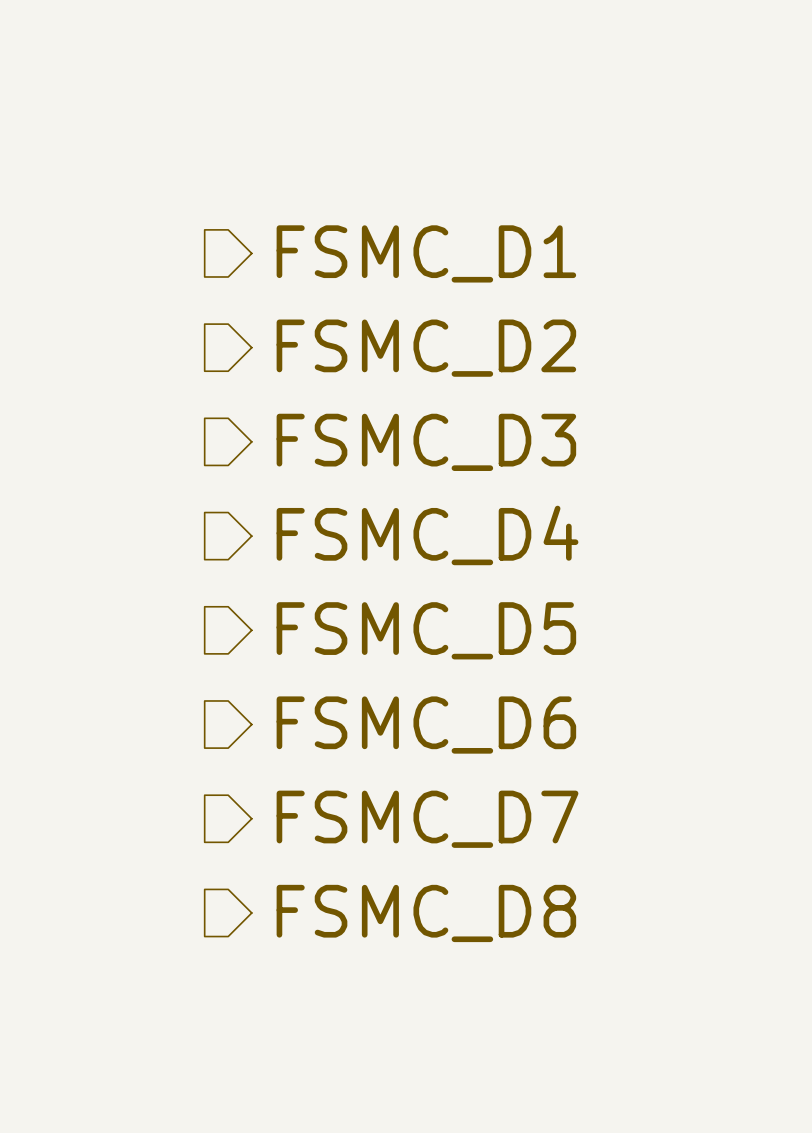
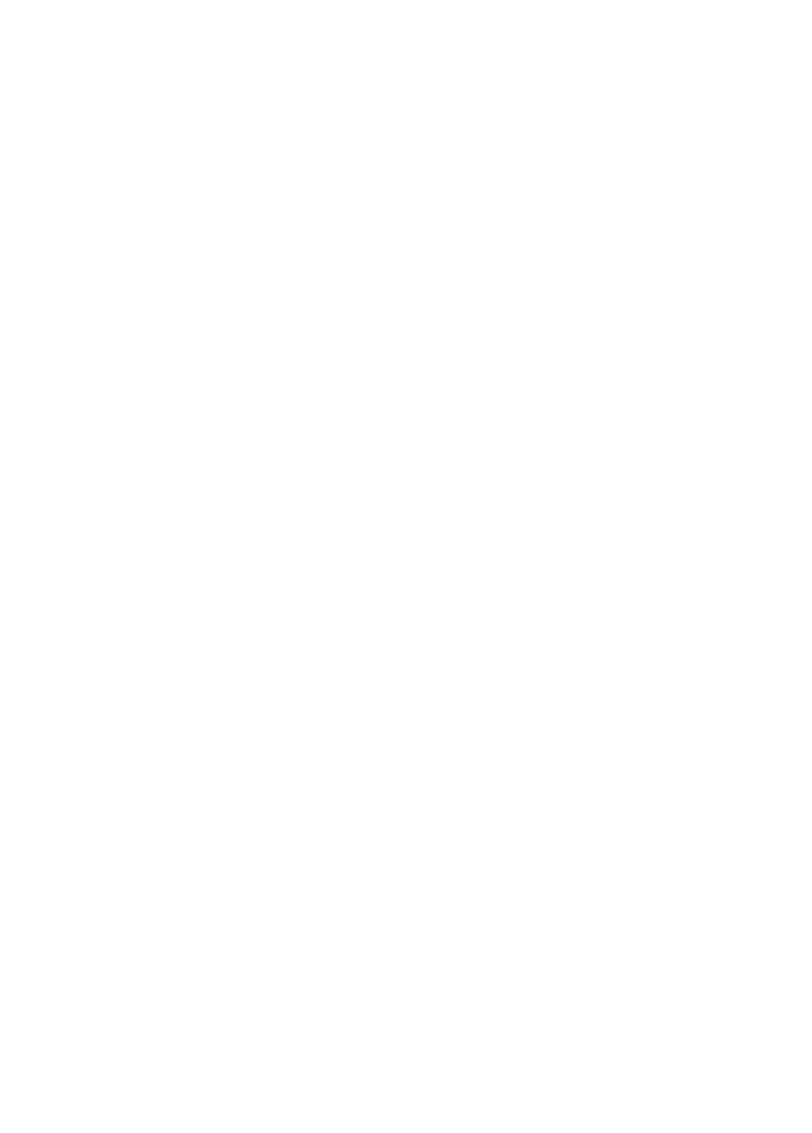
hierarchical label: FSMC_D1 (426, 253) -> none
hierarchical label: FSMC_D2 (426, 348) -> none
hierarchical label: FSMC_D3 (426, 442) -> none
hierarchical label: FSMC_D4 (427, 535) -> none
hierarchical label: FSMC_D5 (426, 630) -> none
hierarchical label: FSMC_D6 (426, 725) -> none
hierarchical label: FSMC_D7 (427, 819) -> none
hierarchical label: FSMC_D8 (426, 913) -> none

